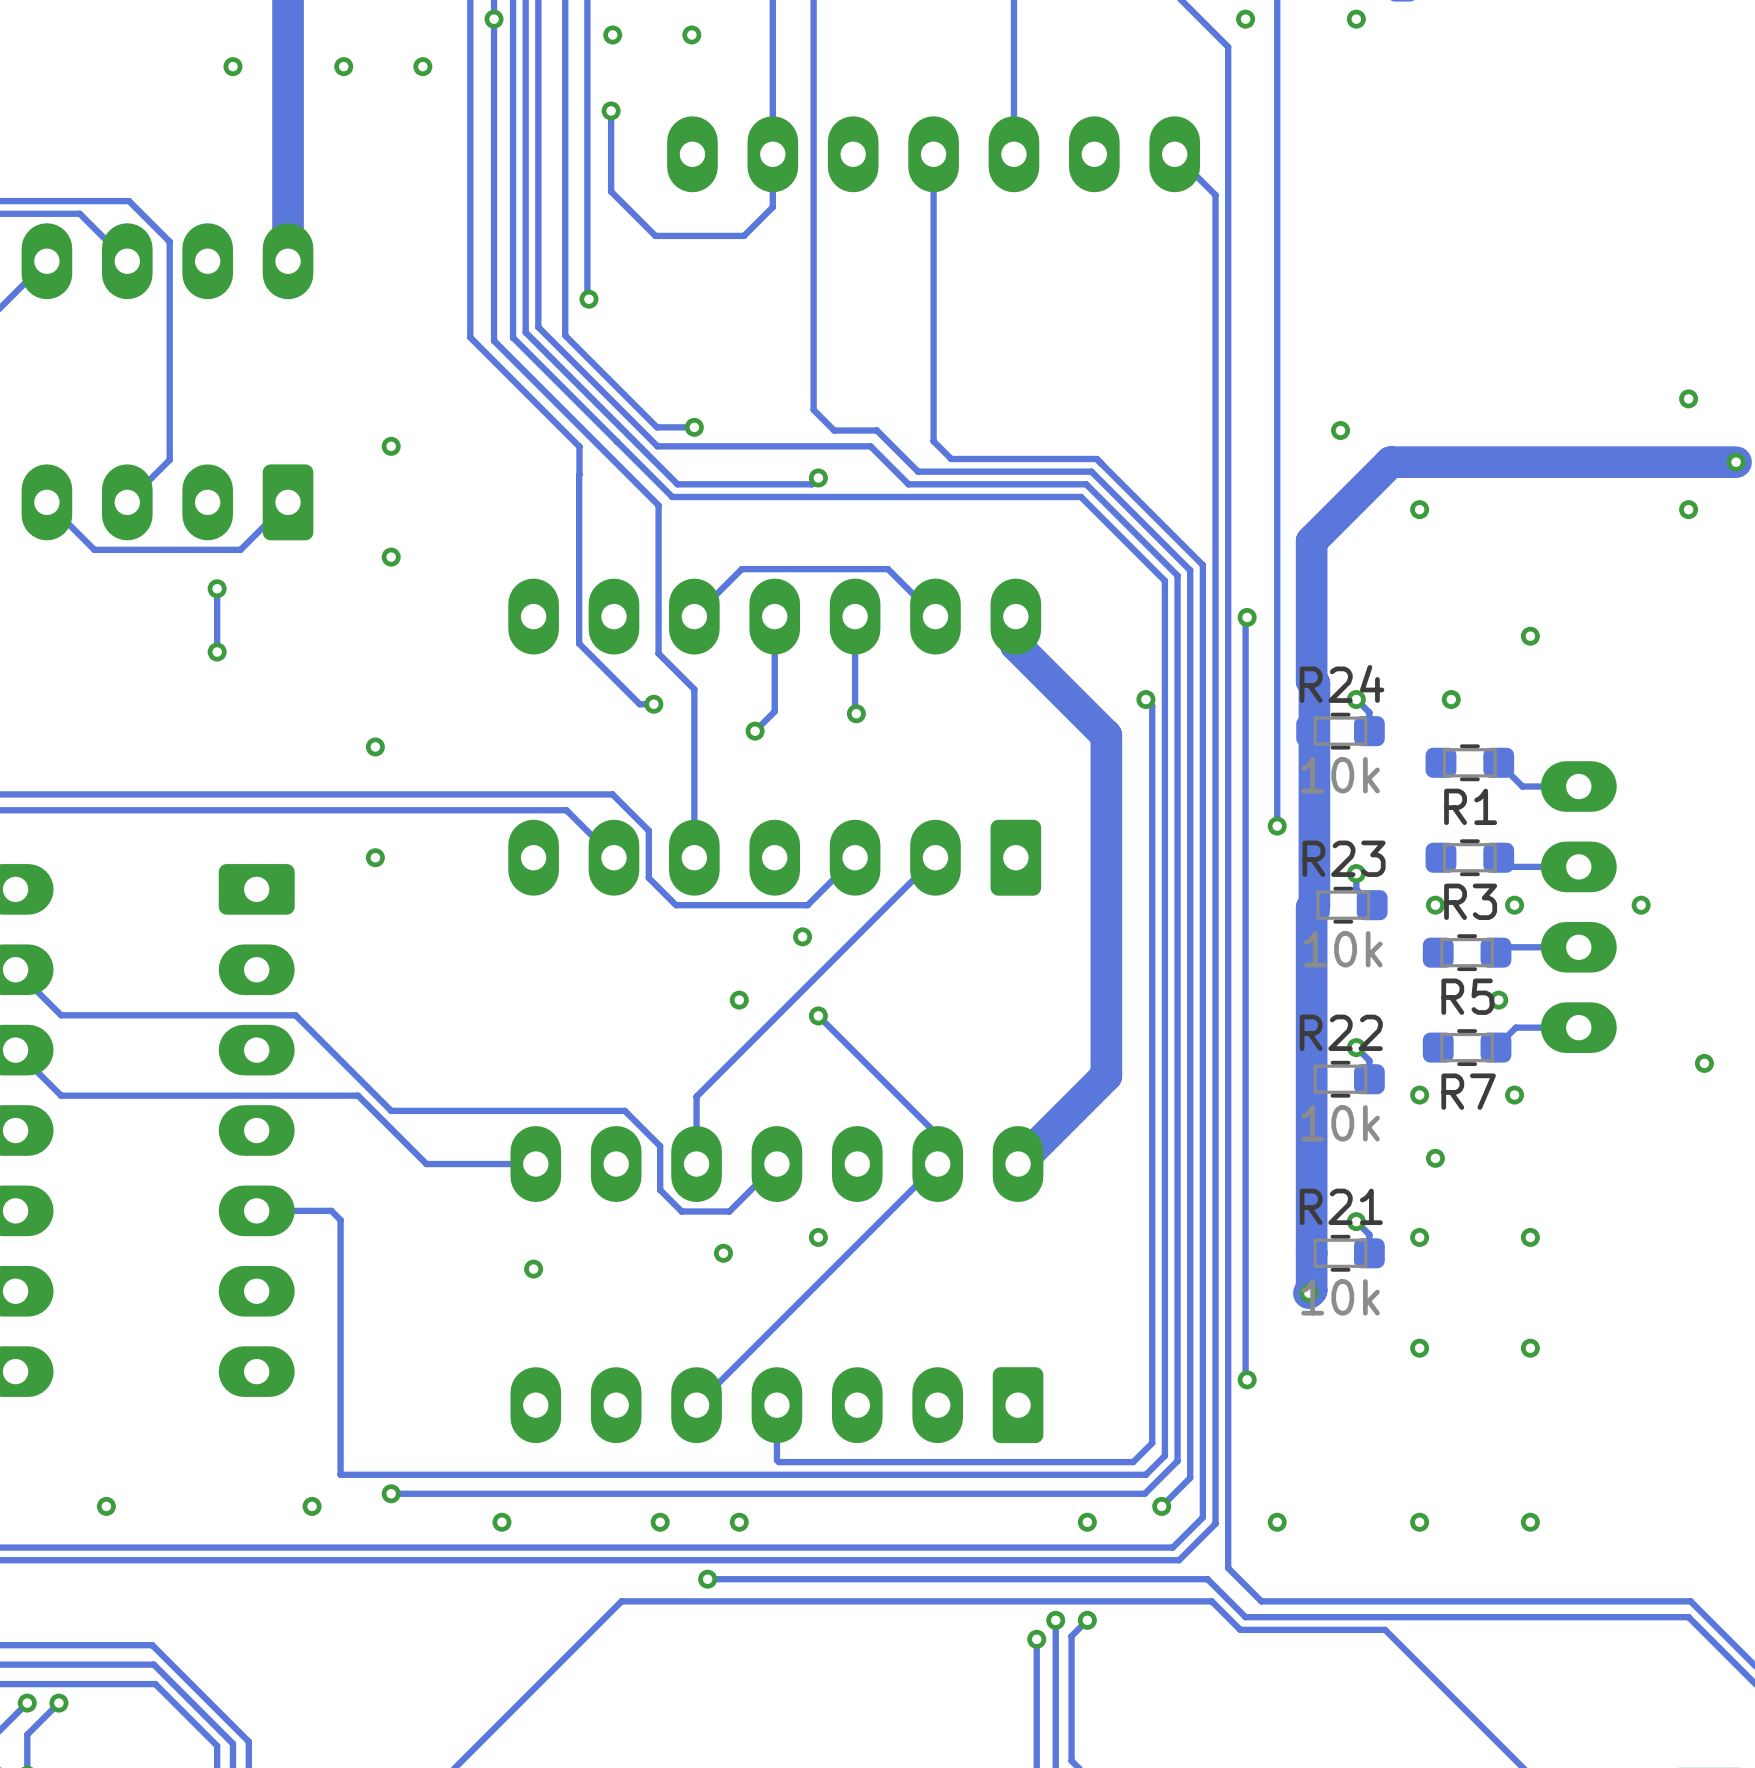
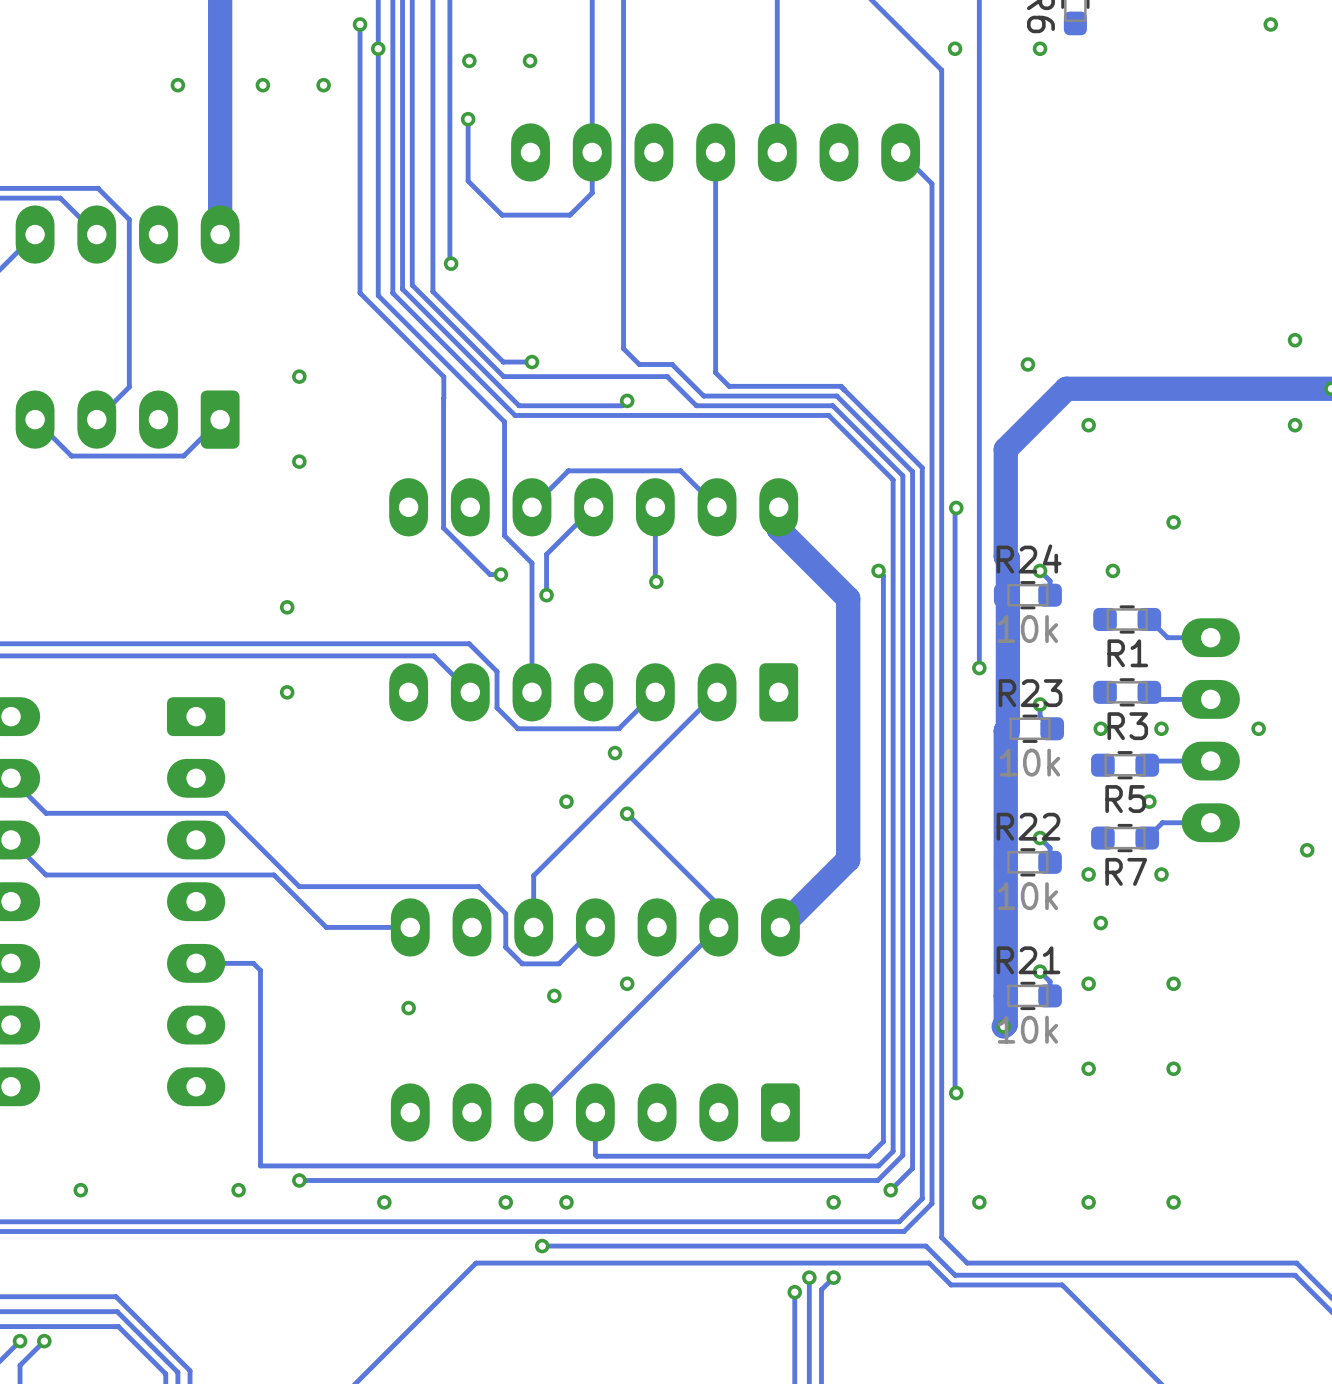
track: (217, 588) (217, 652) -> none
via: (217, 588) -> none
track: (774, 616) (774, 711) (755, 731) -> (593, 507) (546, 554) (546, 595)
via: (217, 652) -> none
via position: (755, 731) -> (546, 595)

